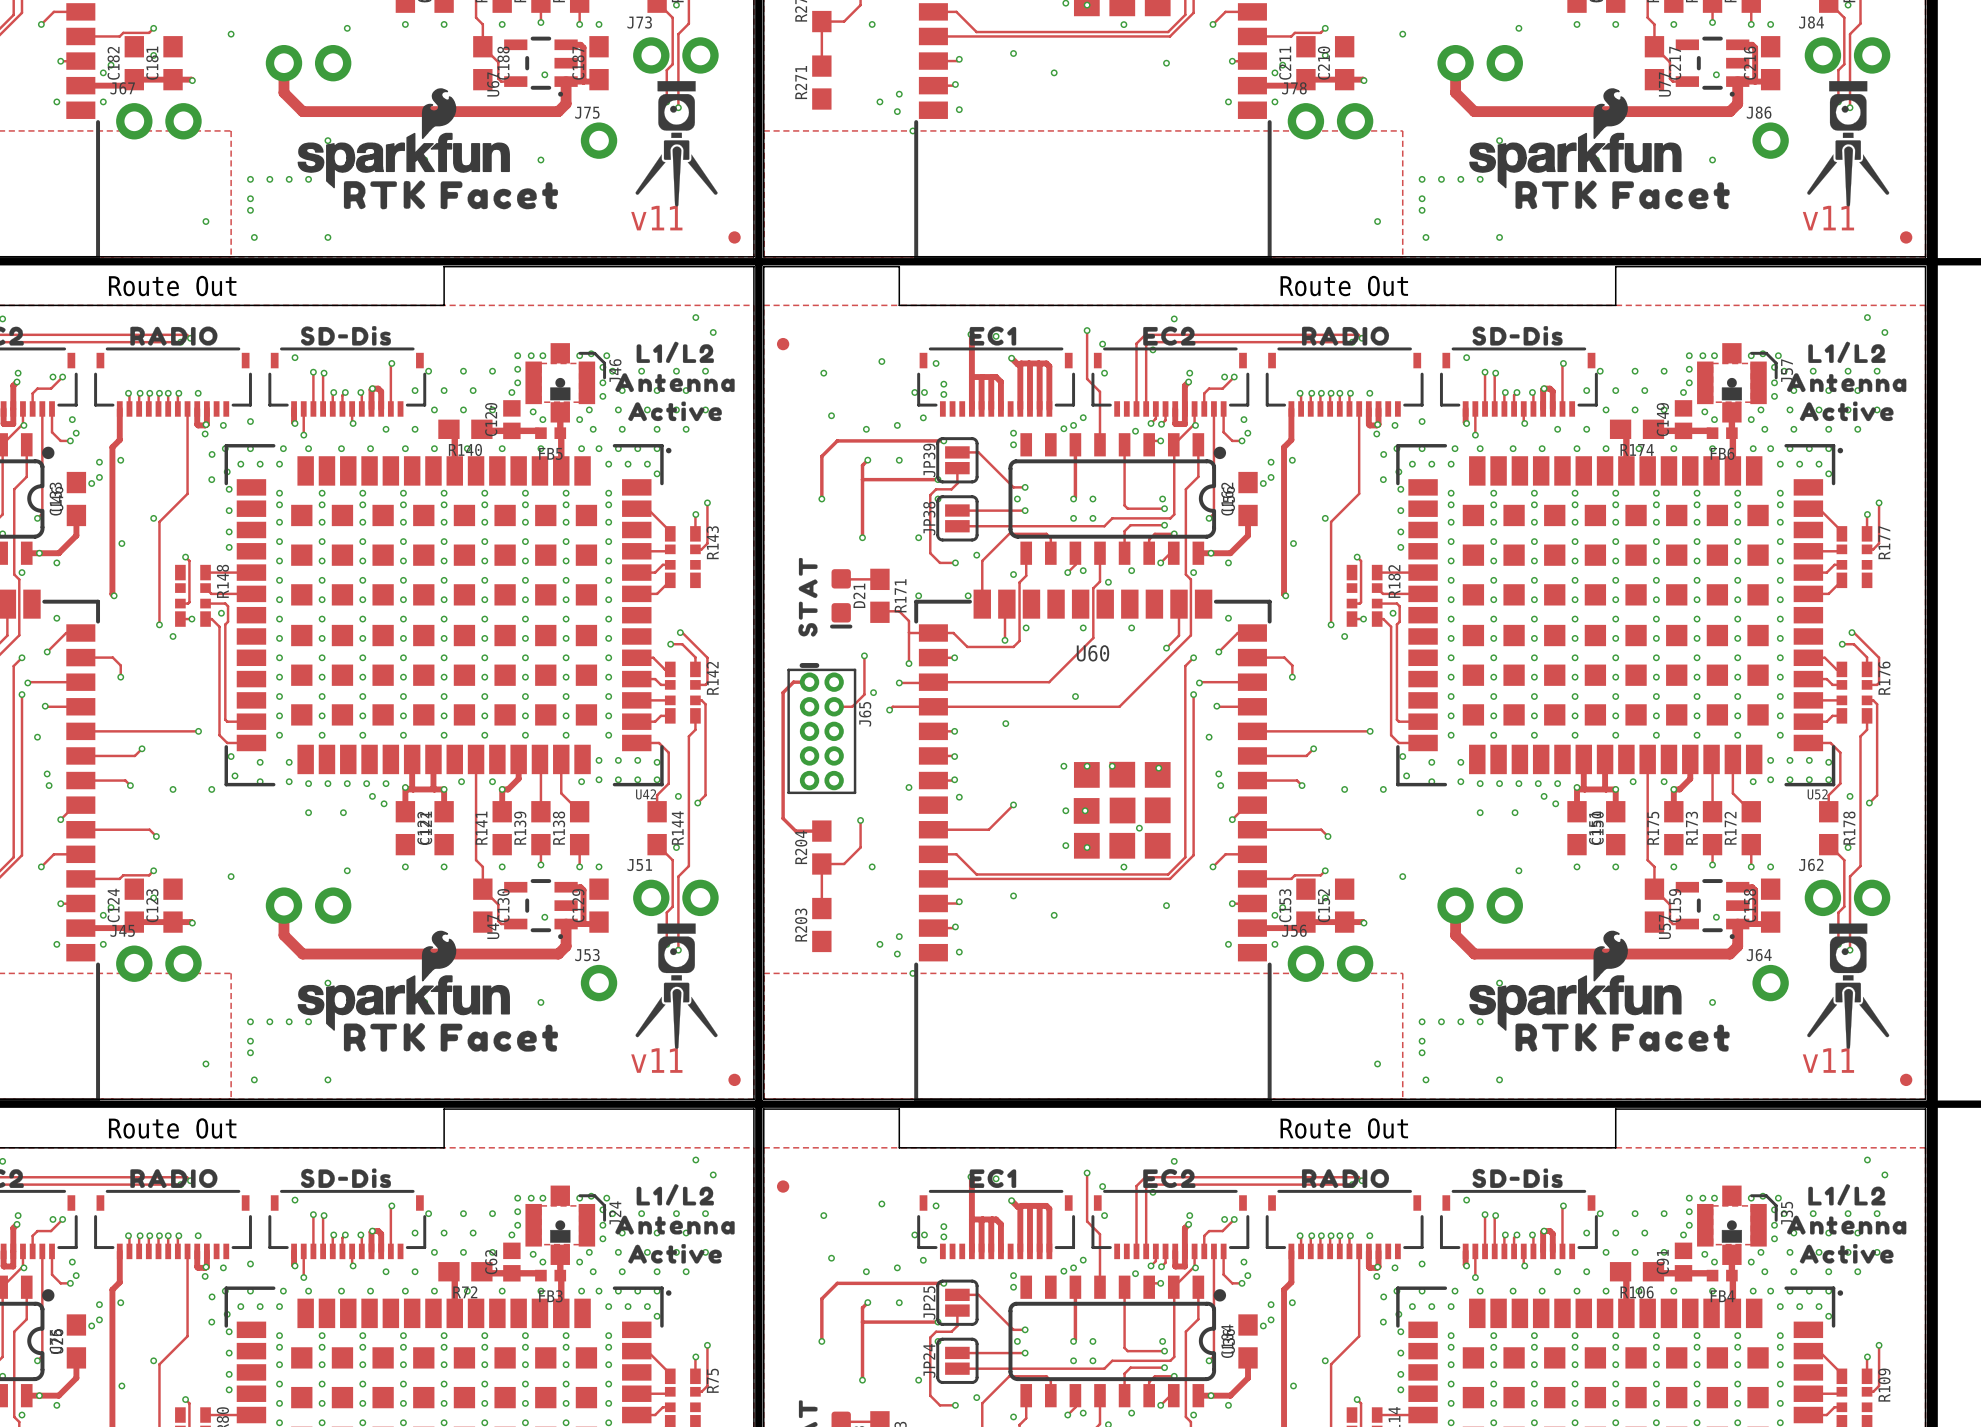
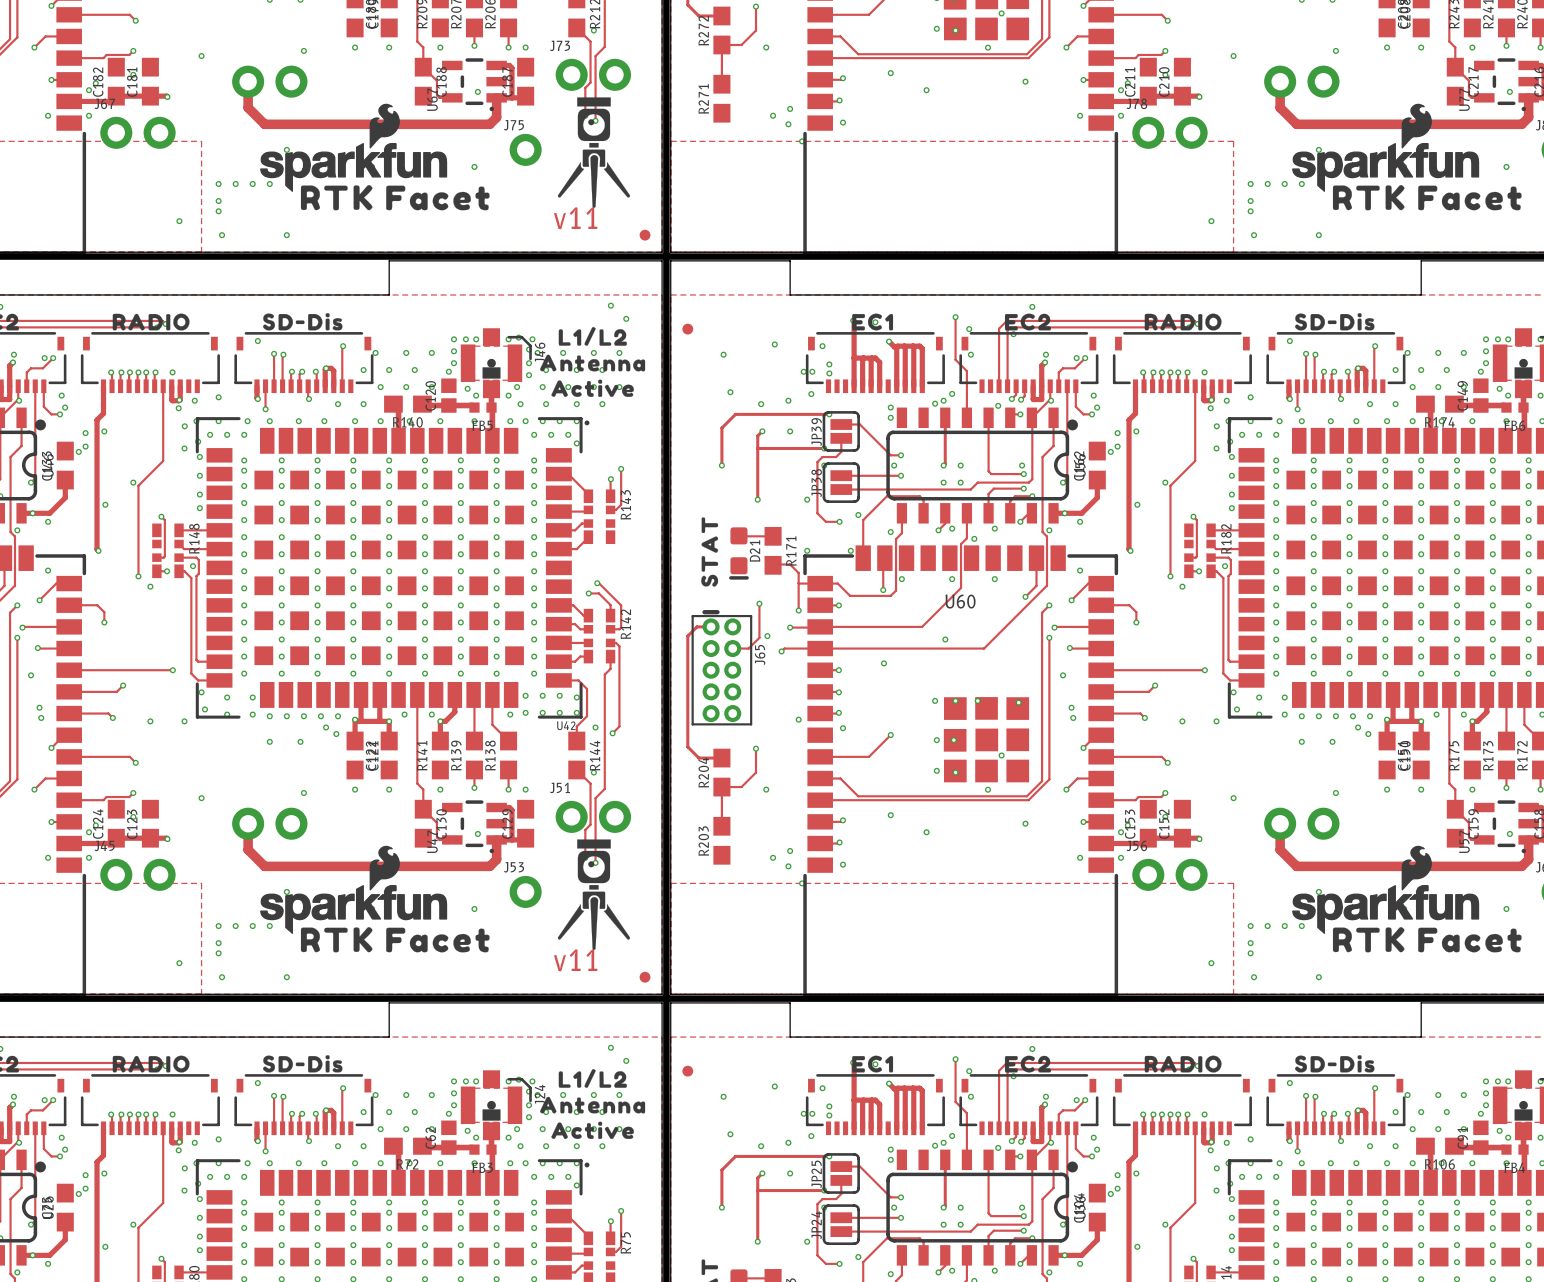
text: Route Out (172, 286) -> none
text: Route Out (1344, 286) -> none
text: Route Out (172, 1128) -> none
text: Route Out (1344, 1128) -> none

